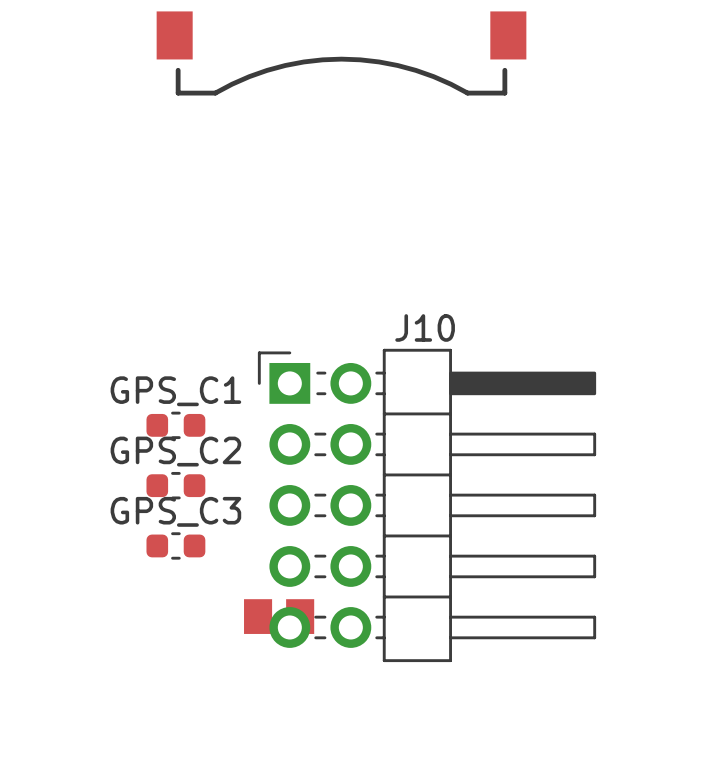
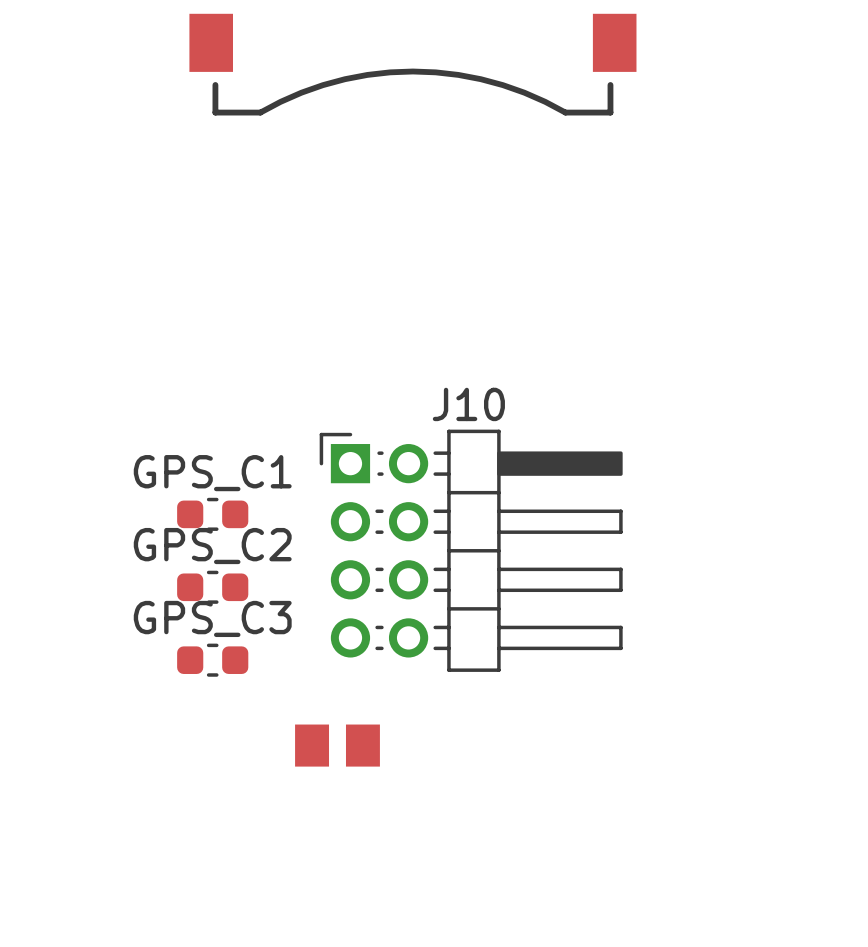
J10 name position: J10 (425, 327) -> J10 (468, 404)
J10 footprint: [257, 348, 597, 663] -> [319, 429, 623, 672]

